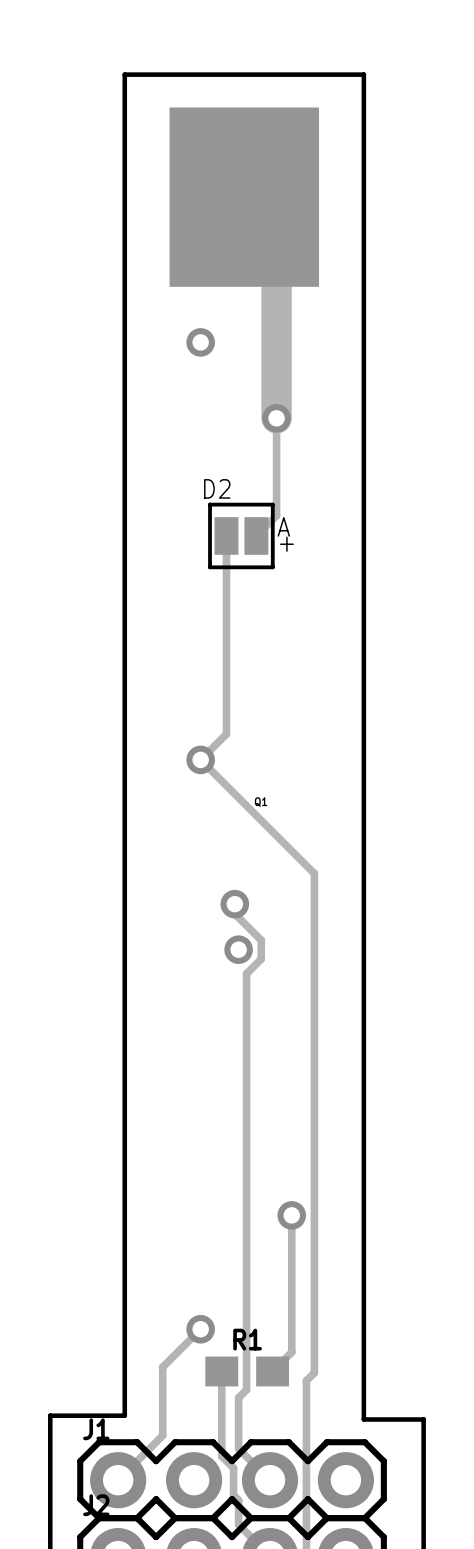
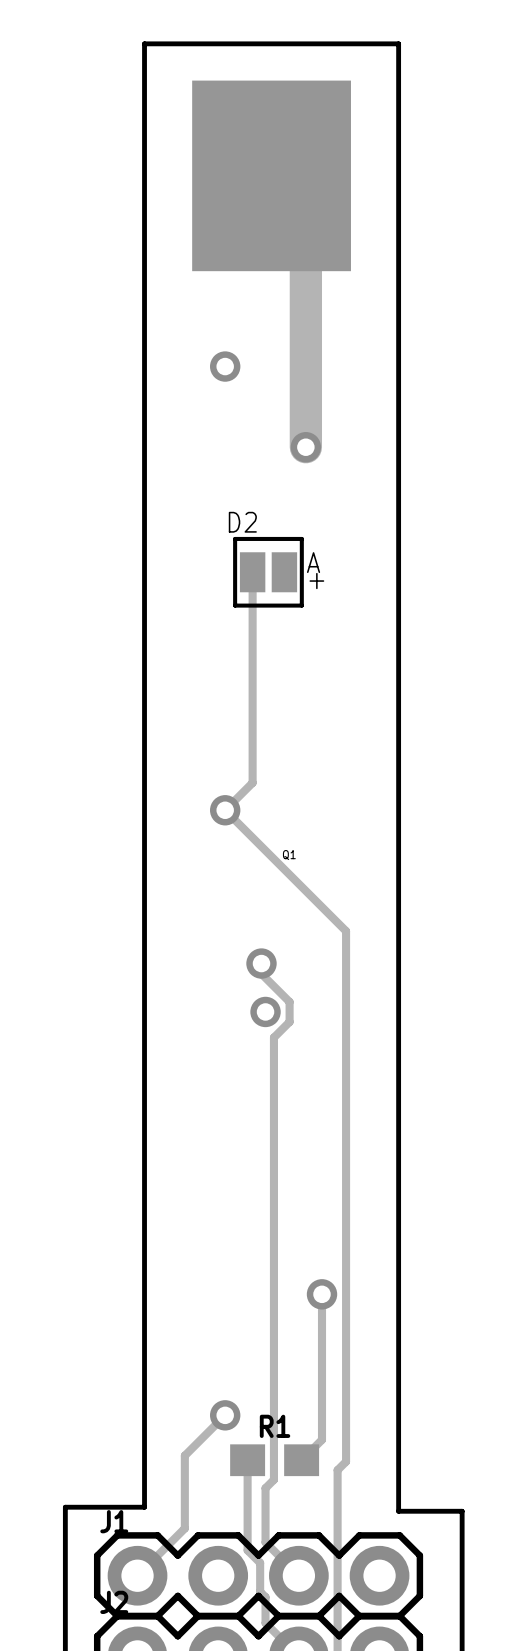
board edge: (124, 74) (363, 74) -> (144, 81) (144, 43) (398, 43) (398, 81)
part position: (244, 197) -> (271, 175)
track: (276, 418) (276, 515) (256, 535) -> none

